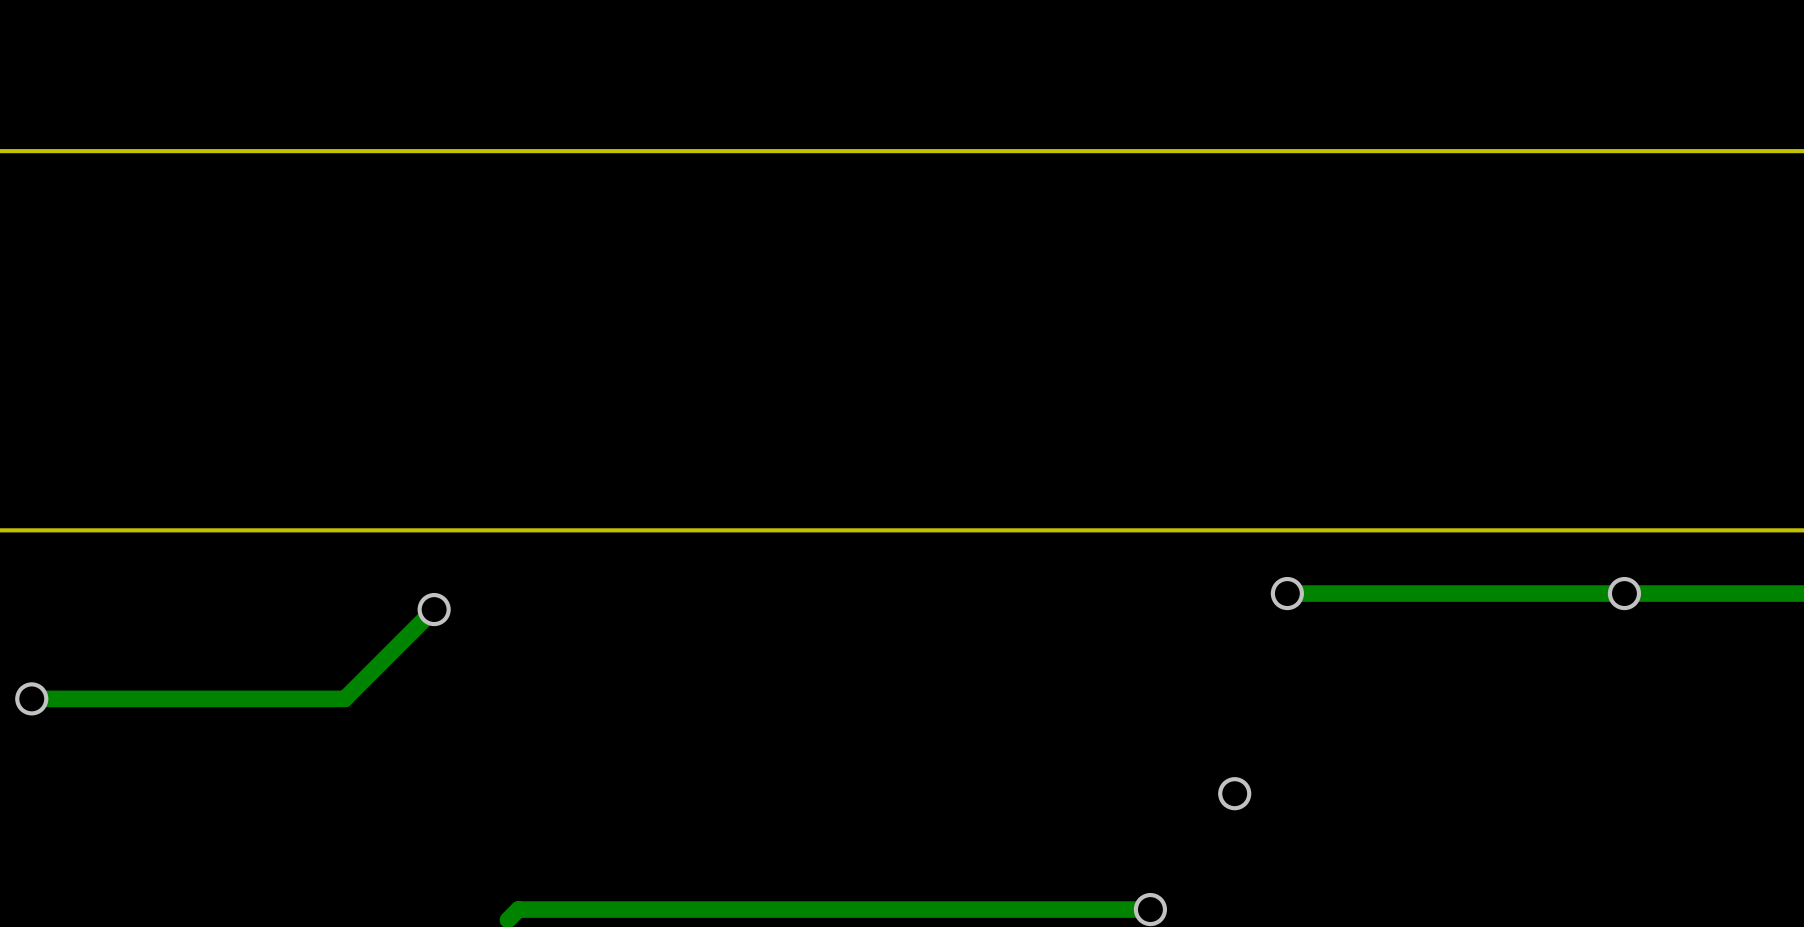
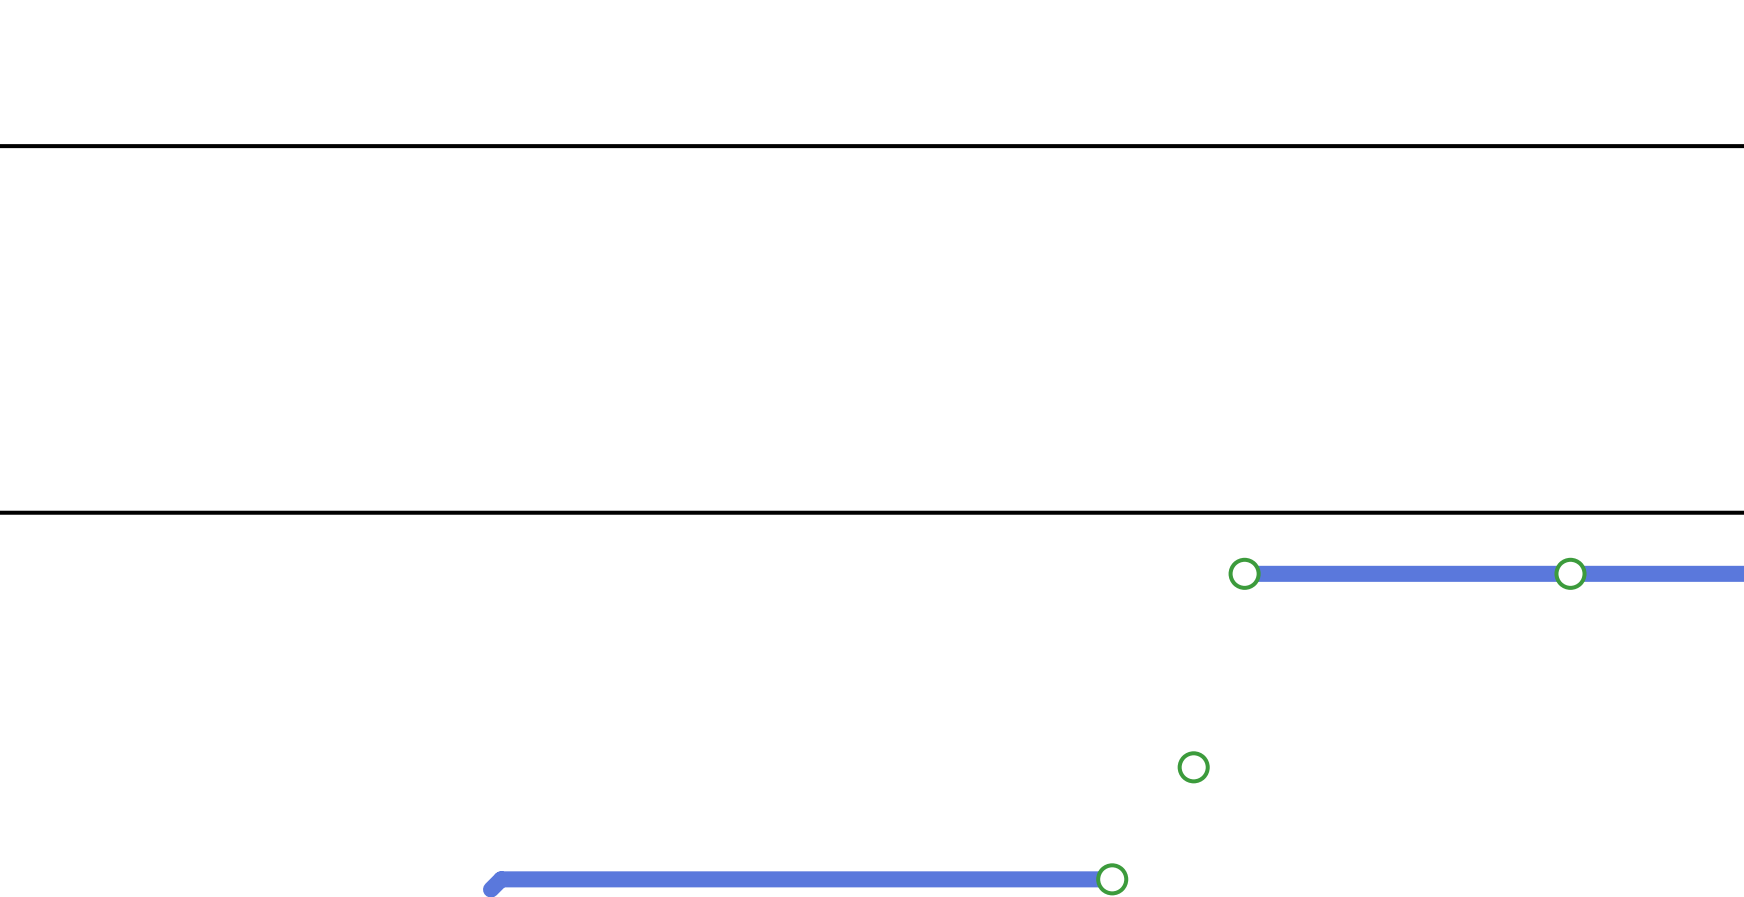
track: (434, 609) (344, 698) (31, 698) -> none
via: (434, 609) -> none
via: (31, 698) -> none

